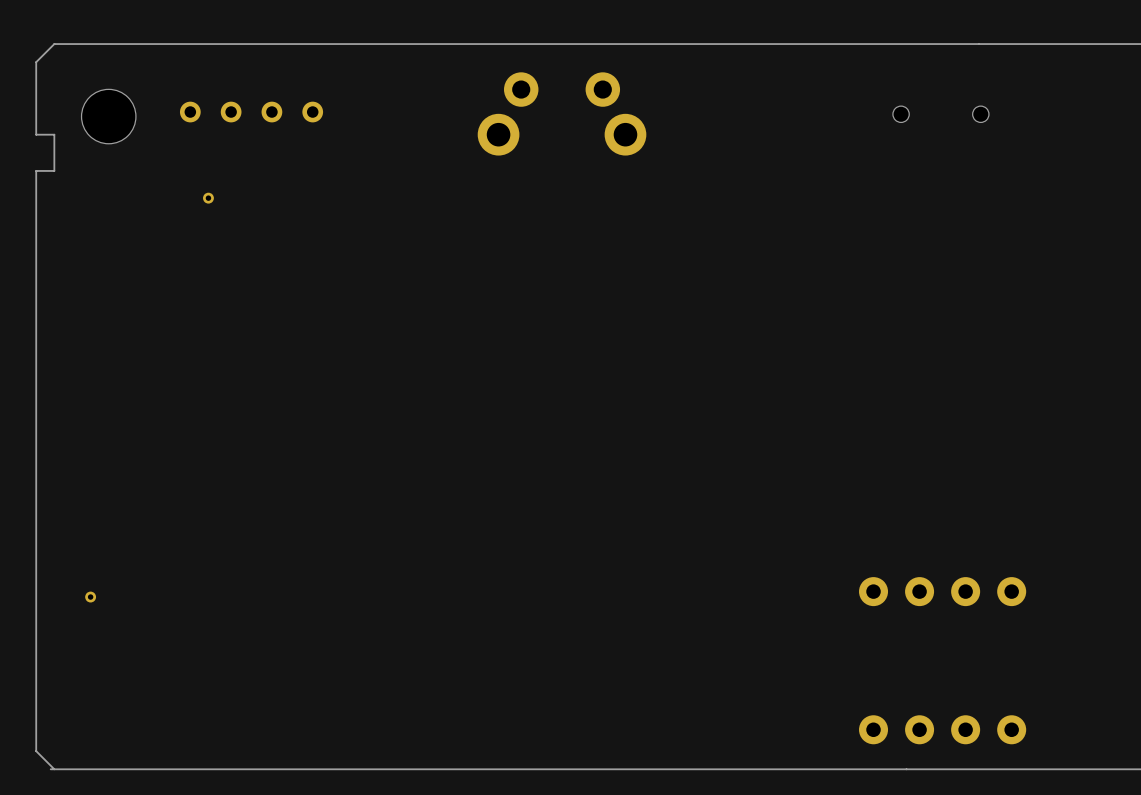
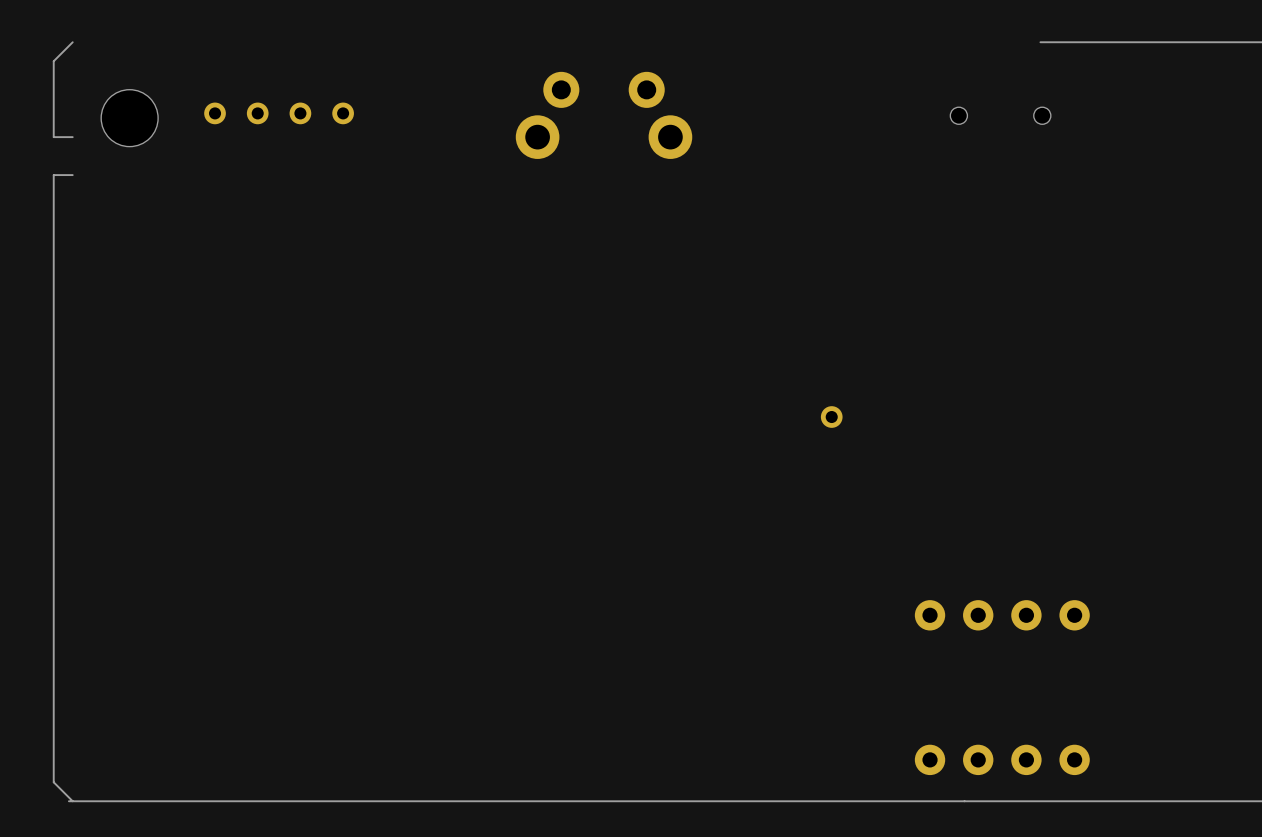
board edge: (979, 44) (54, 44) -> none
board edge: (54, 134) (54, 170) -> none
part: (208, 198) -> none
part: none -> (831, 417)
part: (90, 597) -> none

